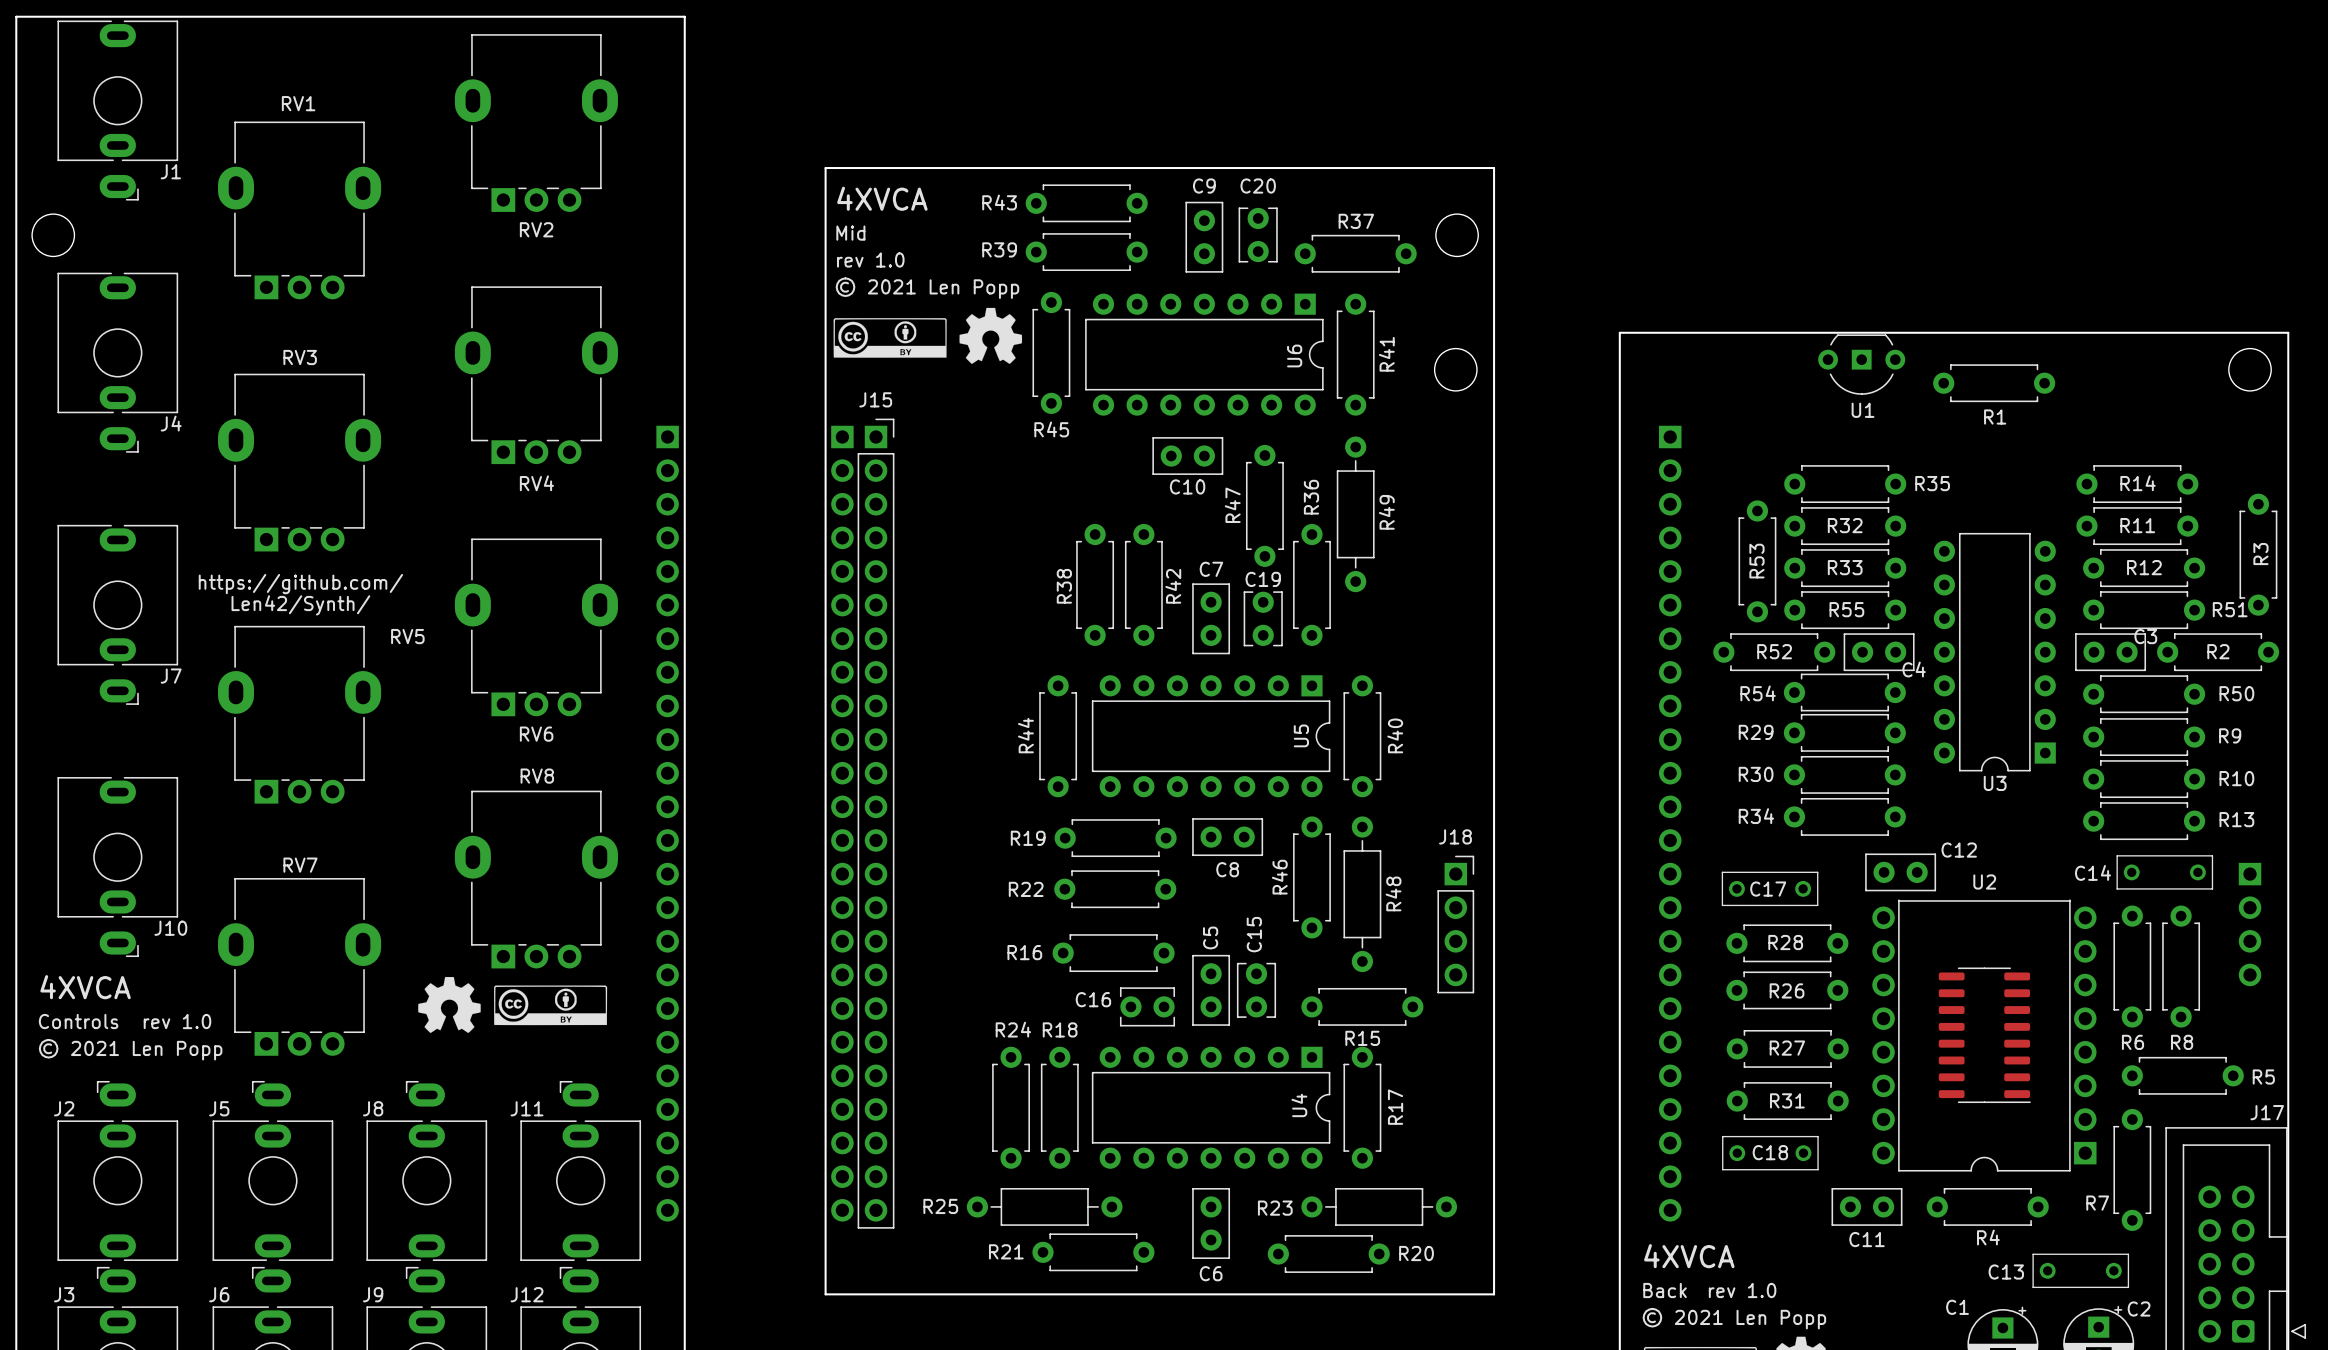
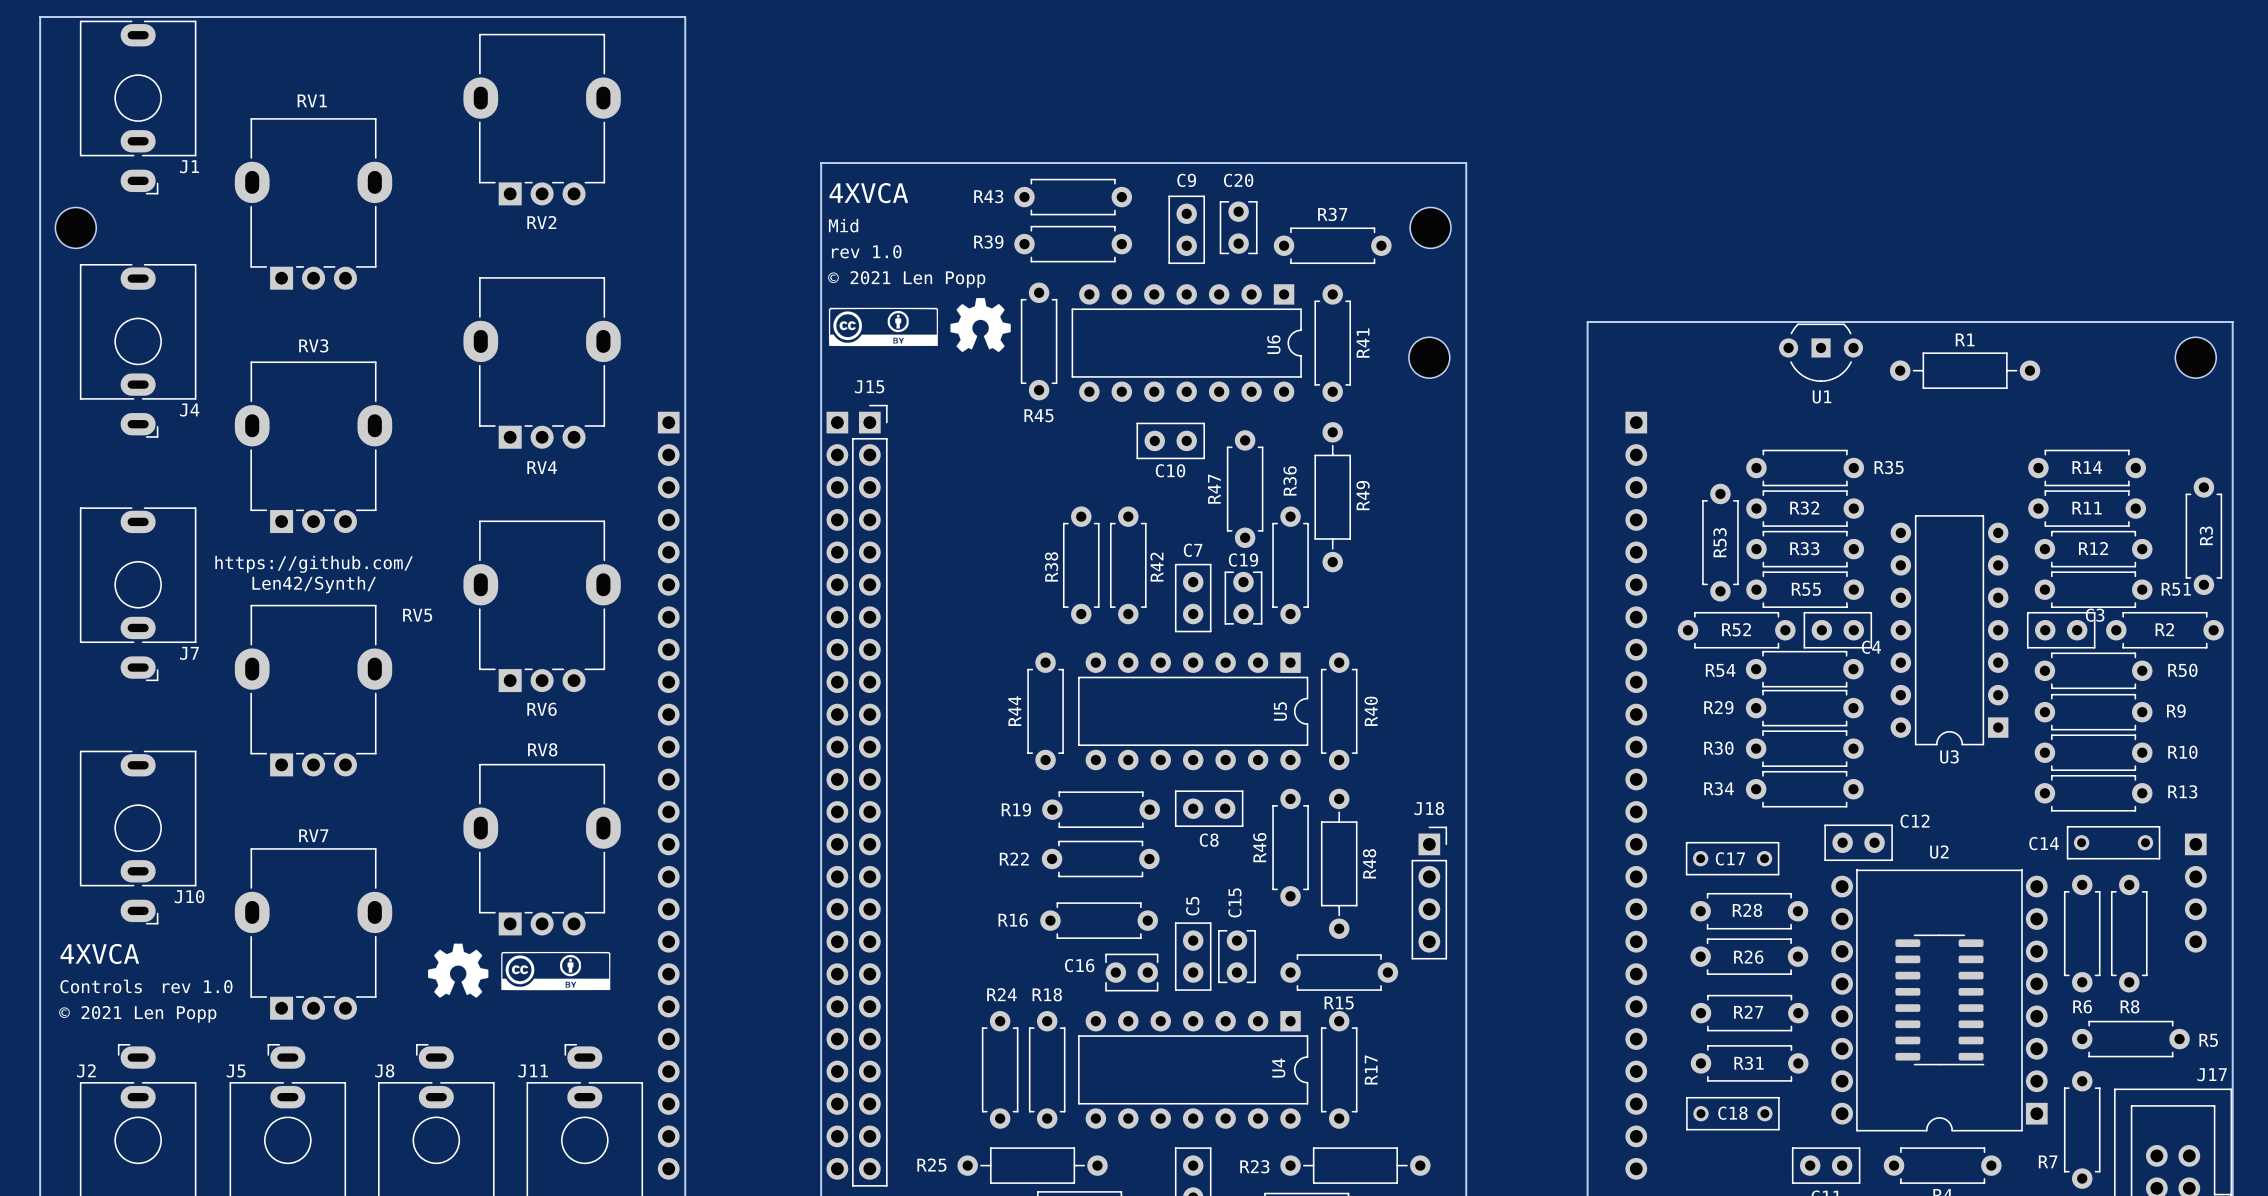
R1 footprint: [1933, 364, 2056, 403] -> [1889, 352, 2041, 389]
R1 name position: R1 (1995, 417) -> R1 (1965, 339)

